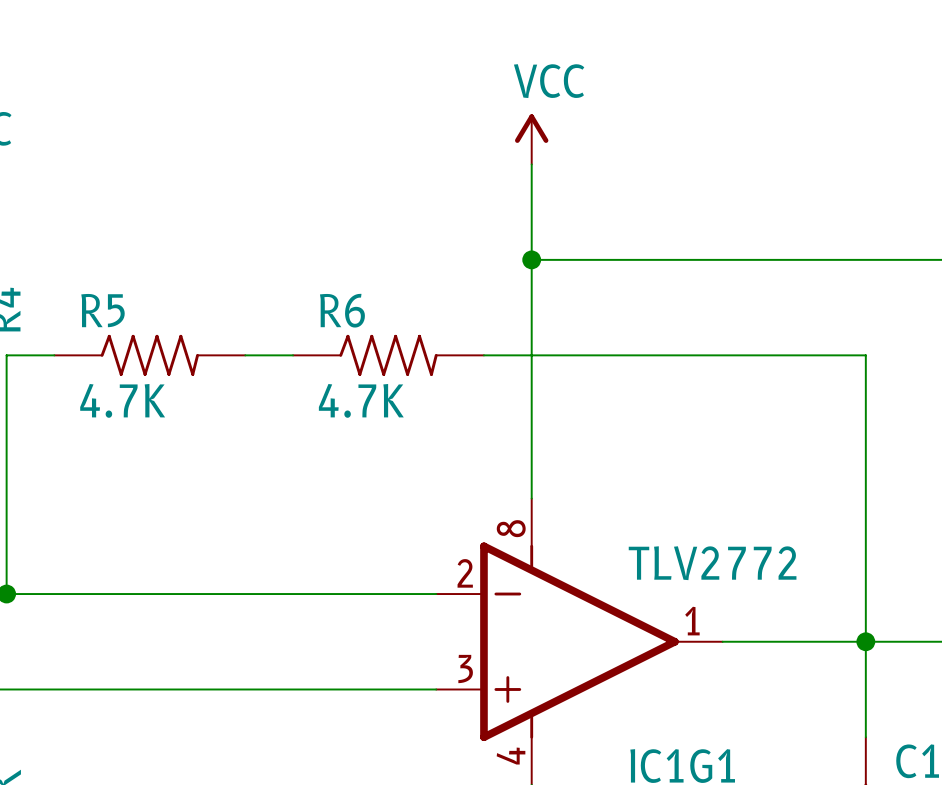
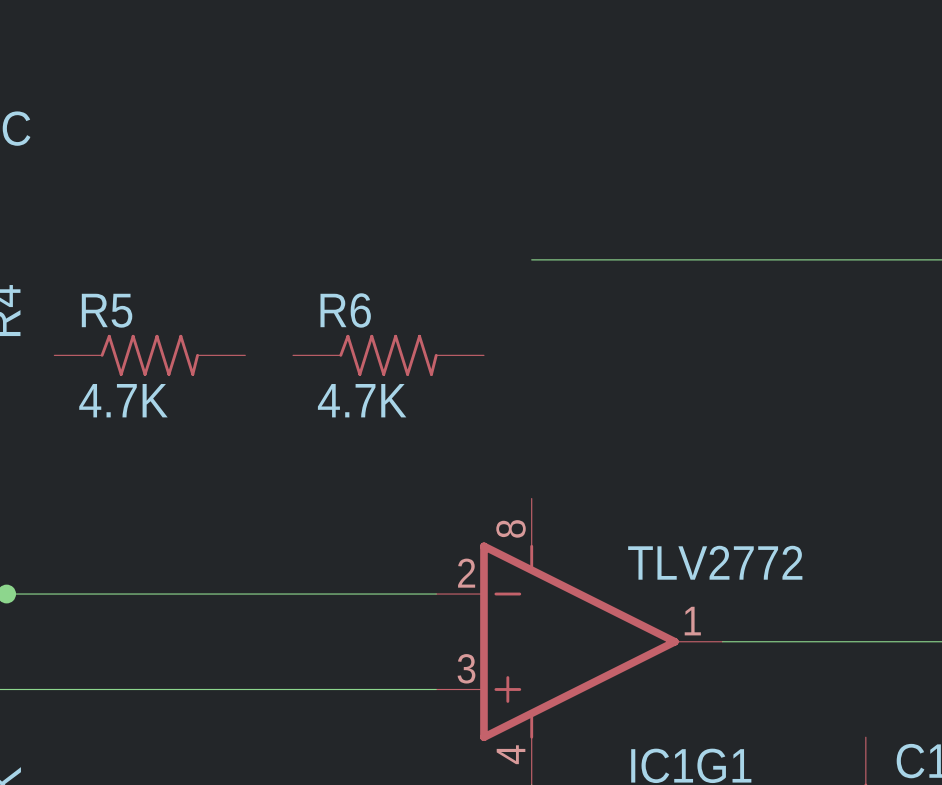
power symbol: VCC (531, 139) -> none
wire: (531, 164) (531, 498) -> none
junction: (531, 259) -> none
wire: (54, 355) (6, 355) (6, 594) -> none
wire: (245, 355) (293, 355) -> none
wire: (483, 355) (865, 355) (865, 737) -> none
junction: (865, 641) -> none

